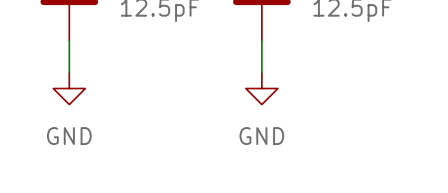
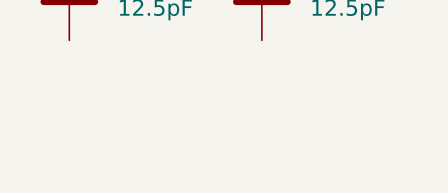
wire: (69, 40) (69, 72) -> none
wire: (261, 40) (261, 72) -> none
power symbol: GND (69, 88) -> none
power symbol: GND (261, 88) -> none

